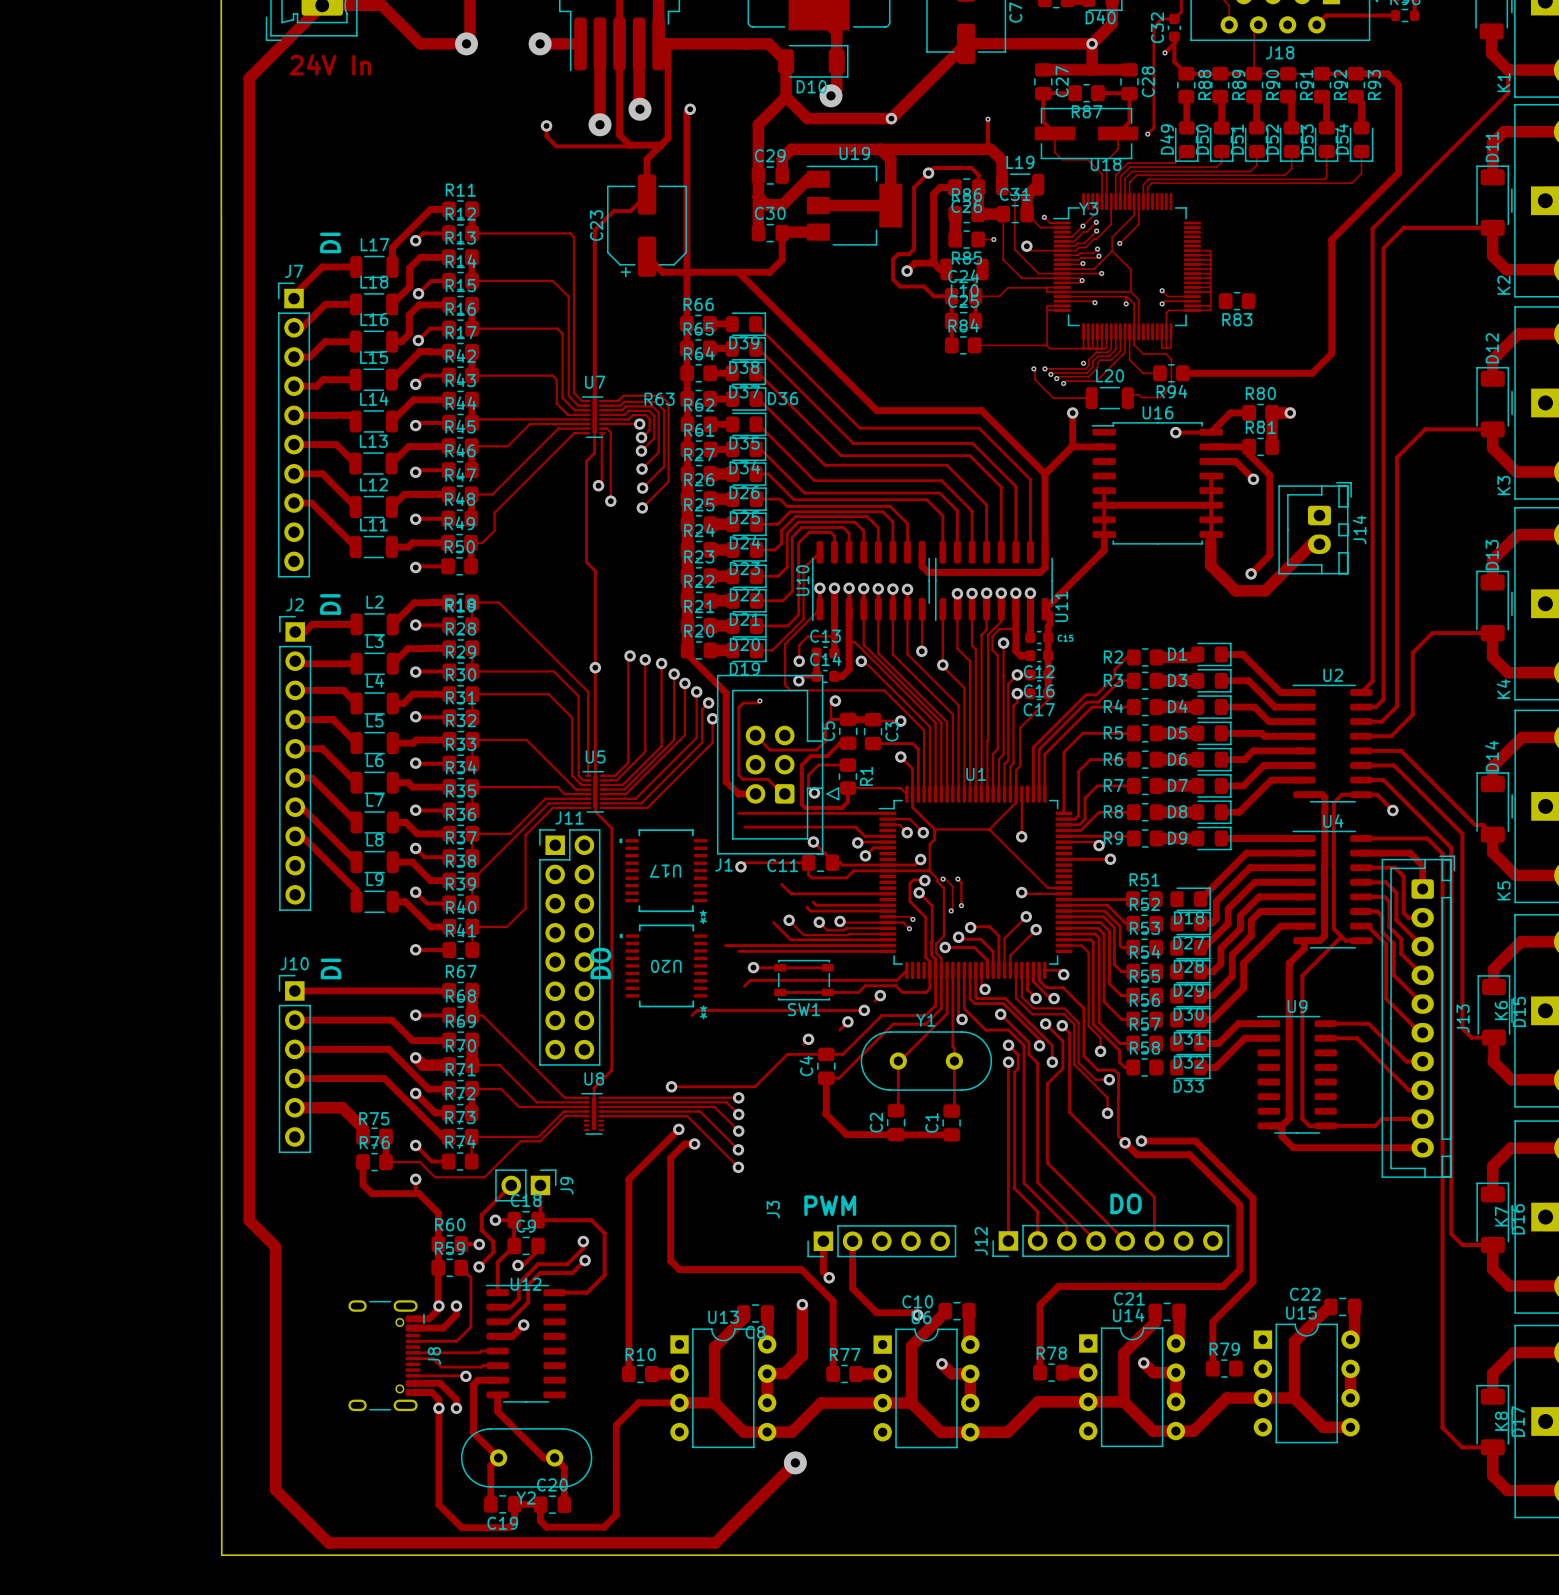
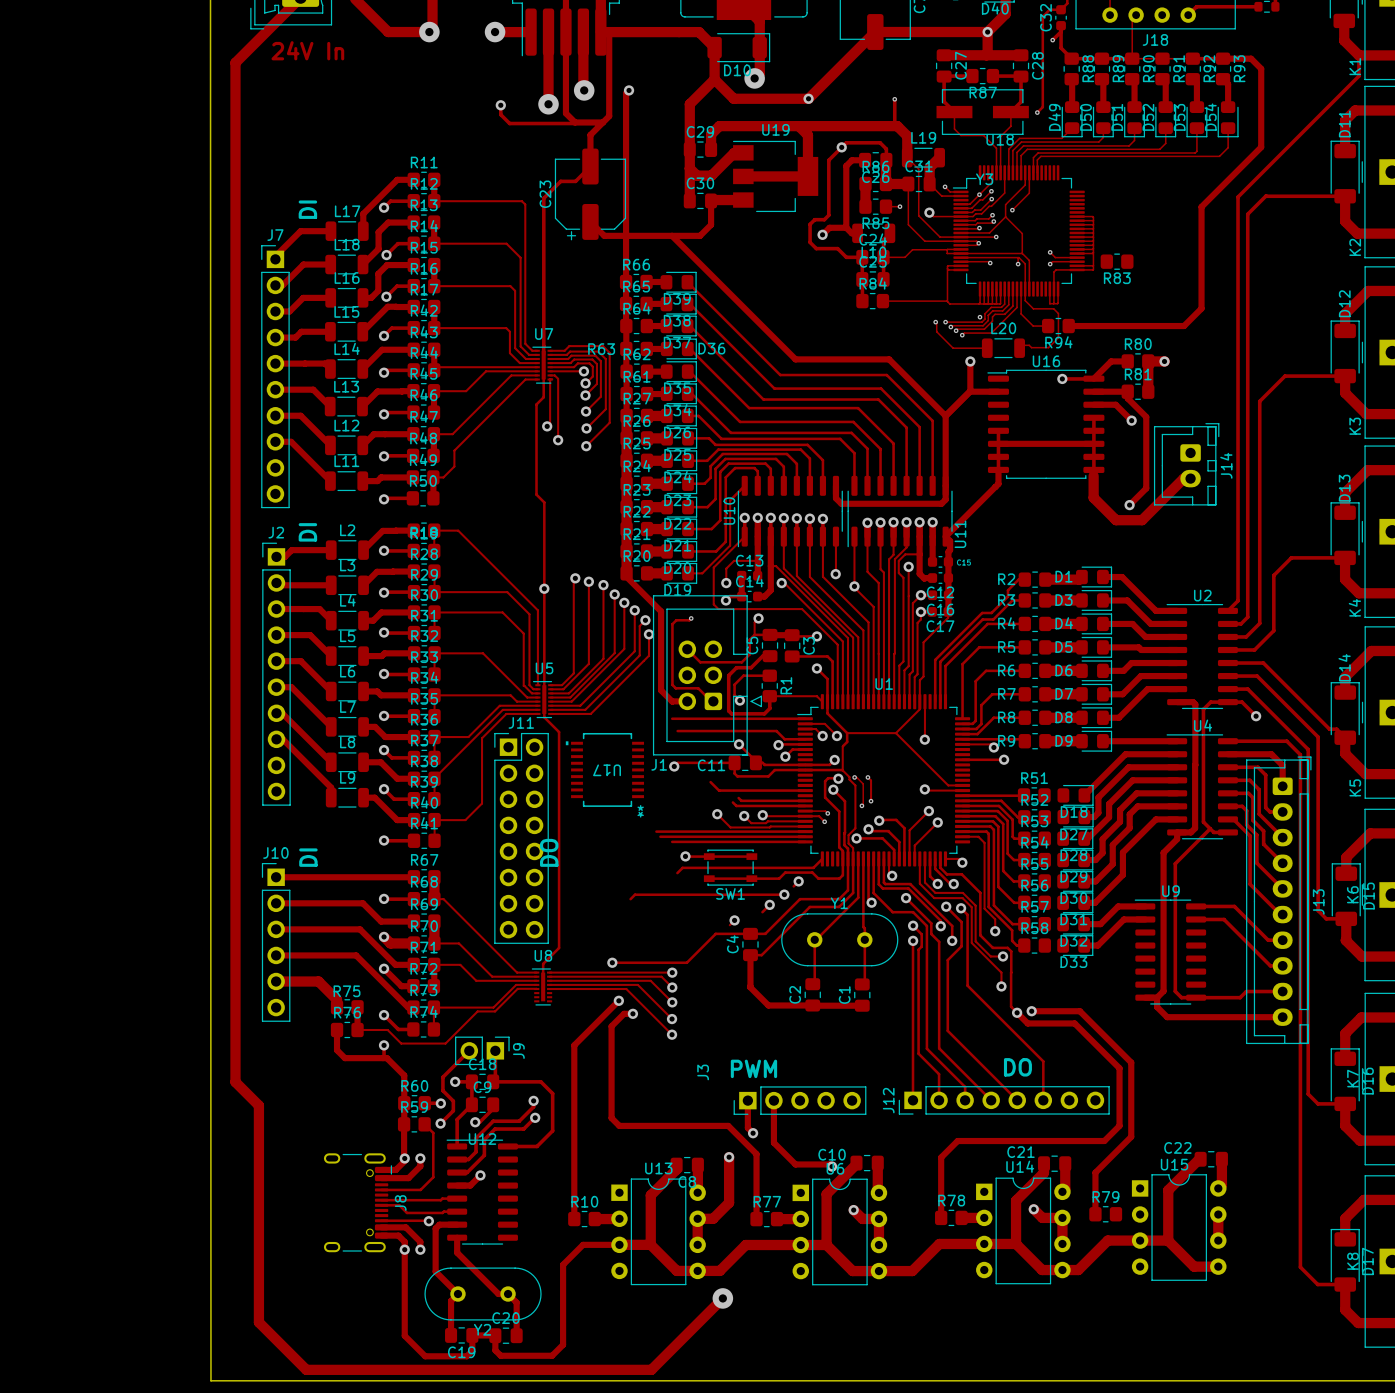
track: (773, 922) (790, 939) -> (656, 831) (718, 831)
U20: (663, 965) -> none

